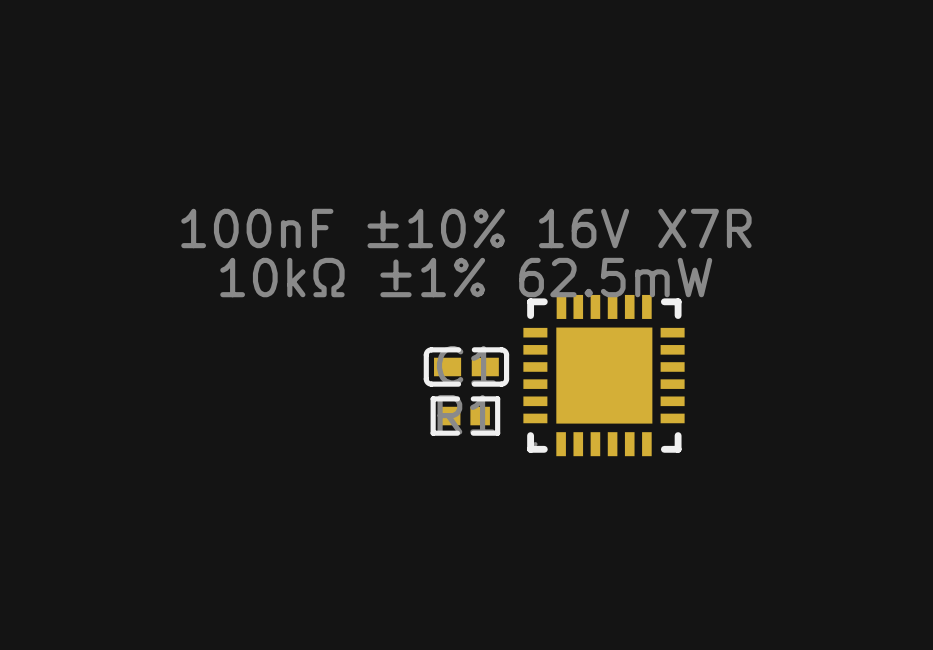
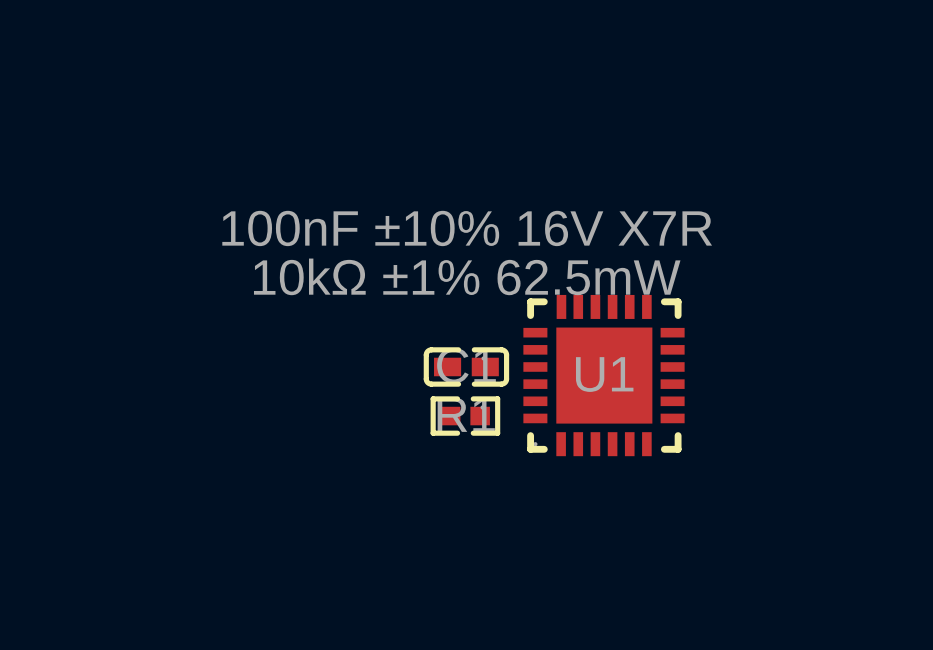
U1 name: none -> U1 (604, 374)

